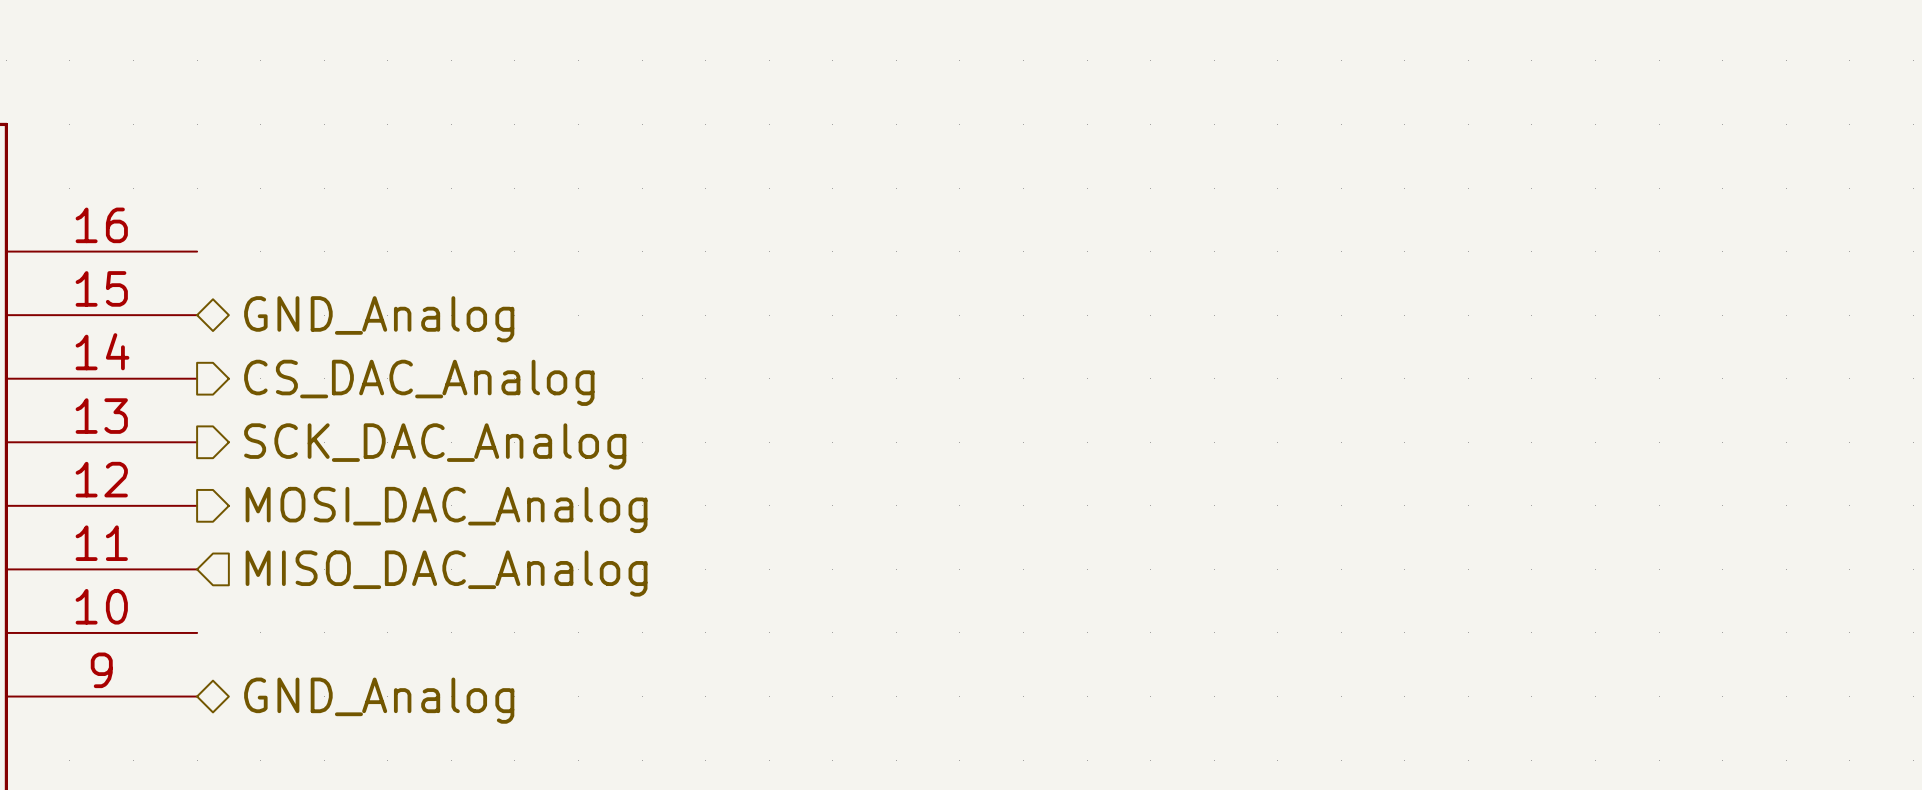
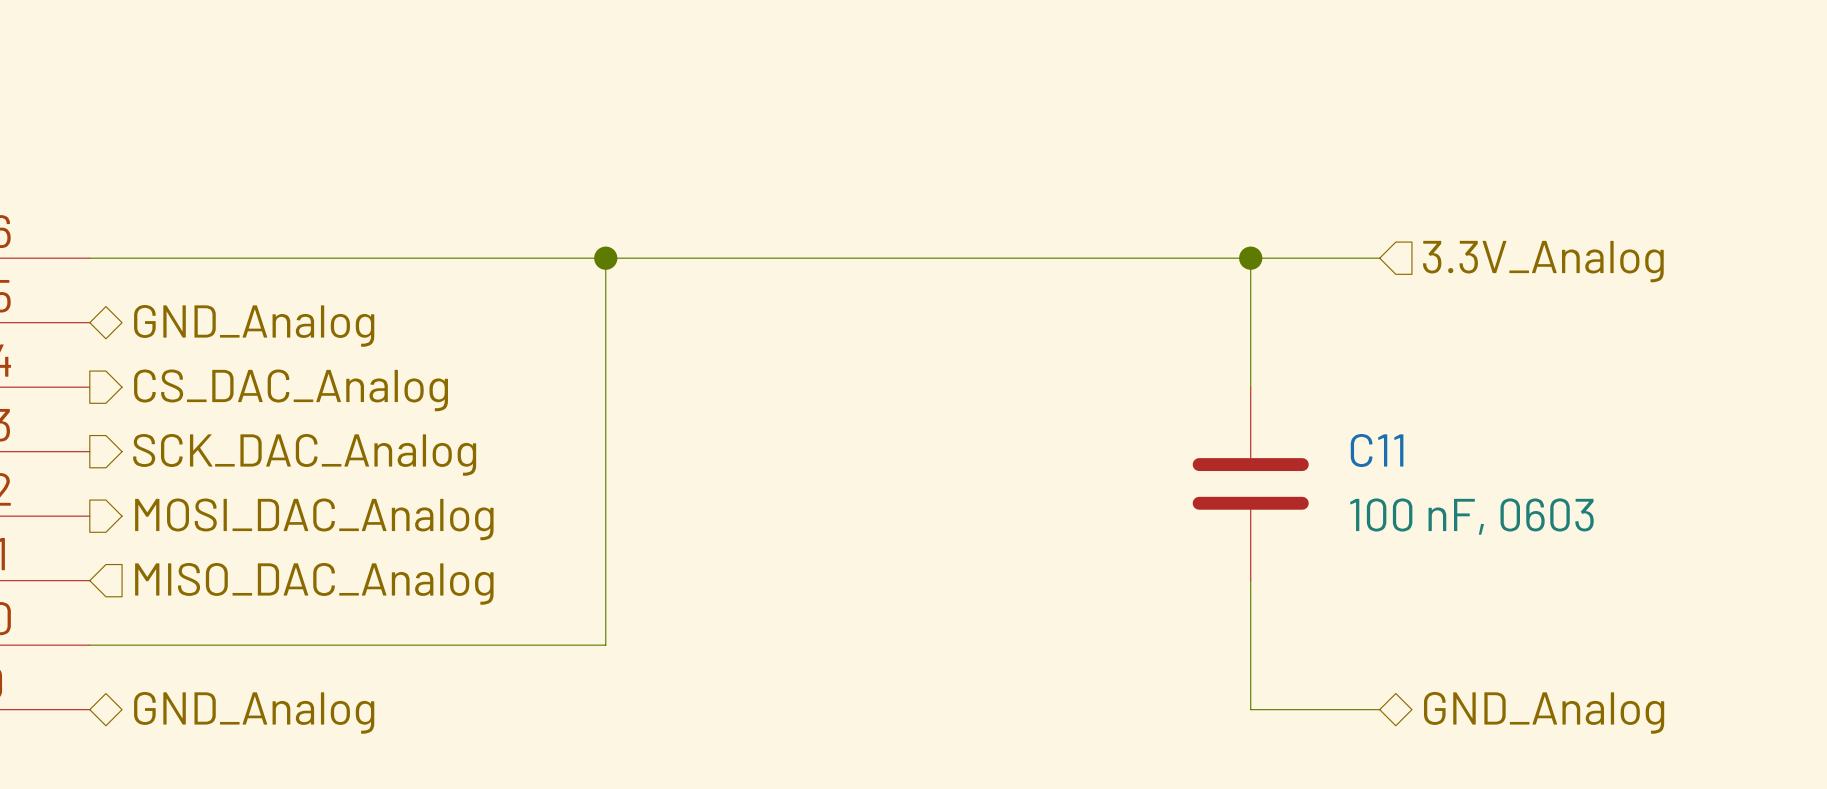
wire: none -> (89, 258) (1379, 258)
wire: none -> (605, 258) (605, 645) (89, 645)
junction: none -> (605, 258)
wire: none -> (1250, 258) (1250, 387)
junction: none -> (1250, 258)
hierarchical label: none -> 3.3V_Analog (1543, 261)
C11: none -> 100 nF, 0603 (1250, 483)
wire: none -> (1250, 580) (1250, 709) (1379, 709)
hierarchical label: none -> GND_Analog (1544, 712)

